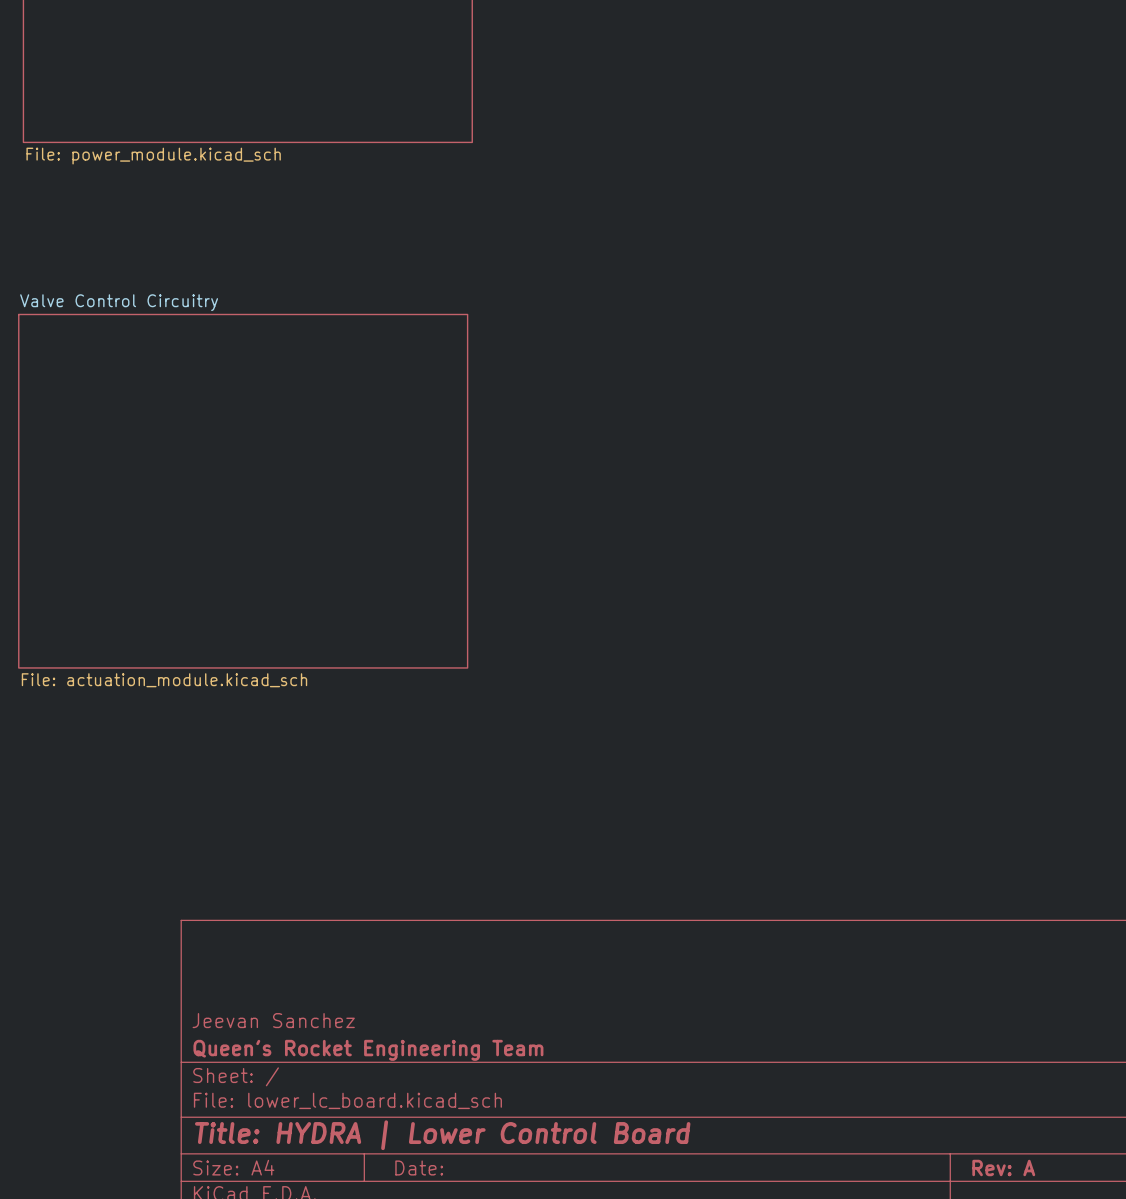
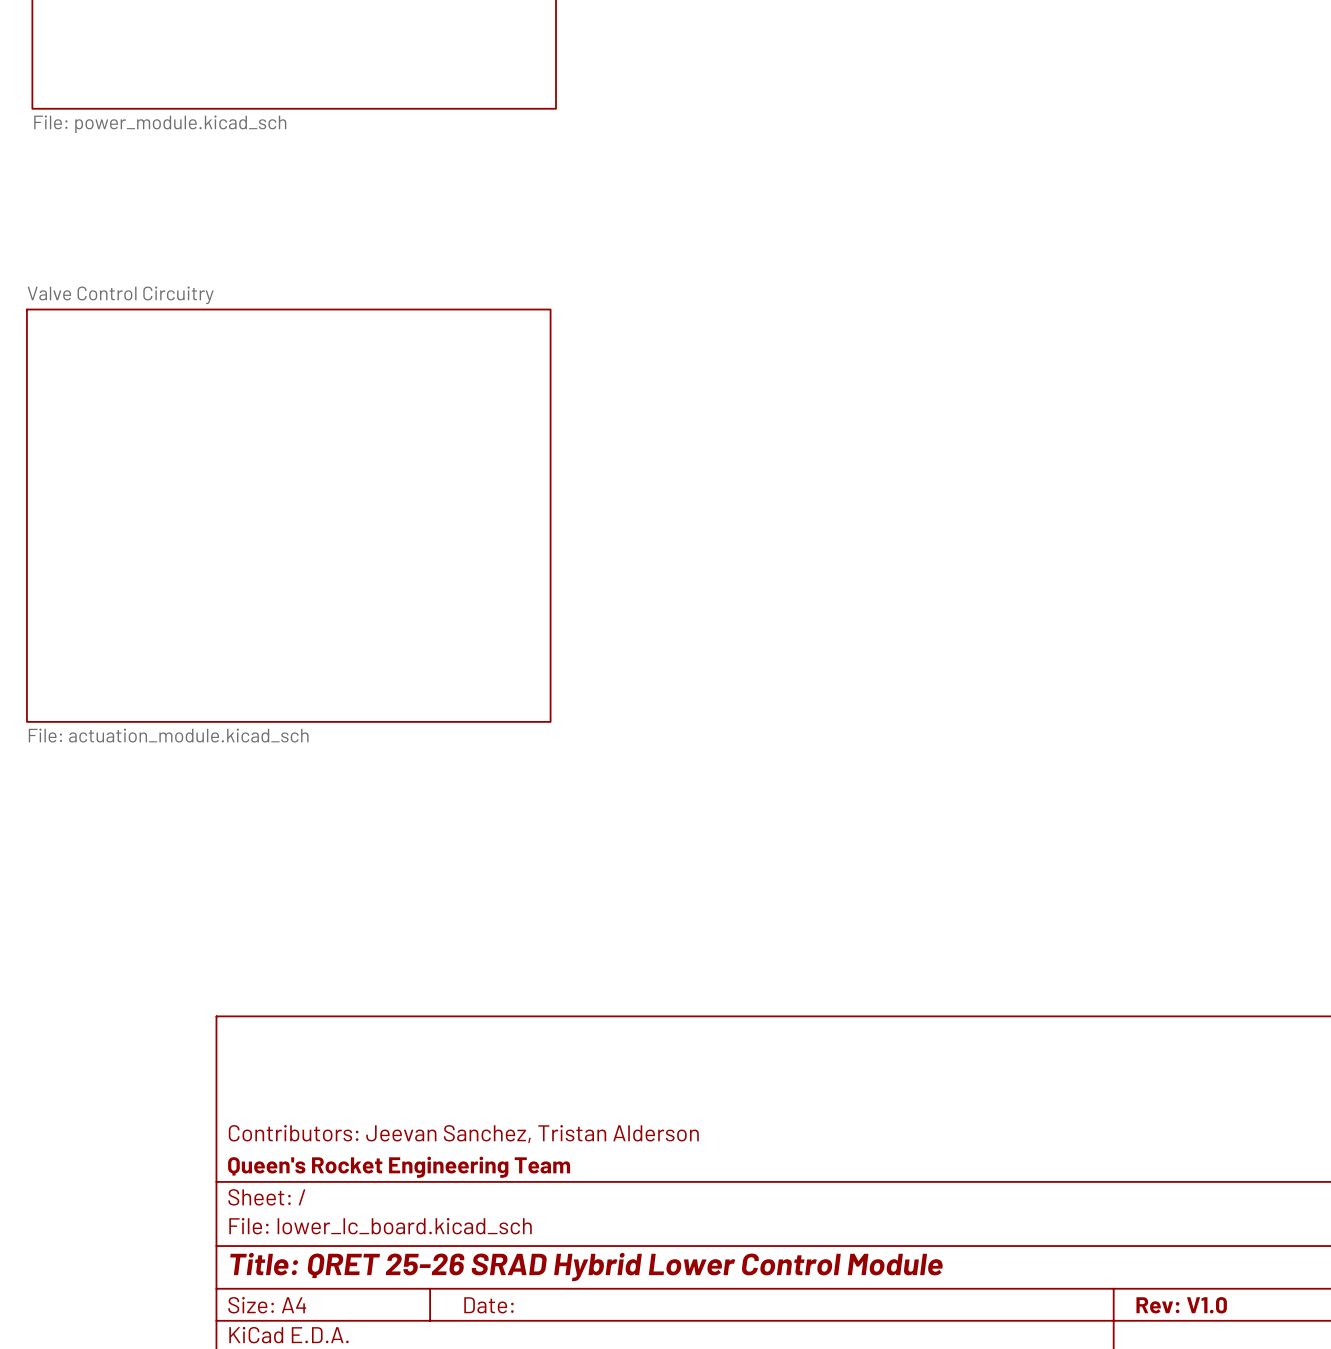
title block: Jeevan Sanchez (273, 1020) -> Contributors: Jeevan Sanchez, Tristan Alderson (463, 1134)
title block: Title: HYDRA | Lower Control Board (442, 1135) -> Title: QRET 25-26 SRAD Hybrid Lower Control Module (586, 1267)
title block: Rev: A (1003, 1167) -> Rev: V1.0 (1181, 1305)

